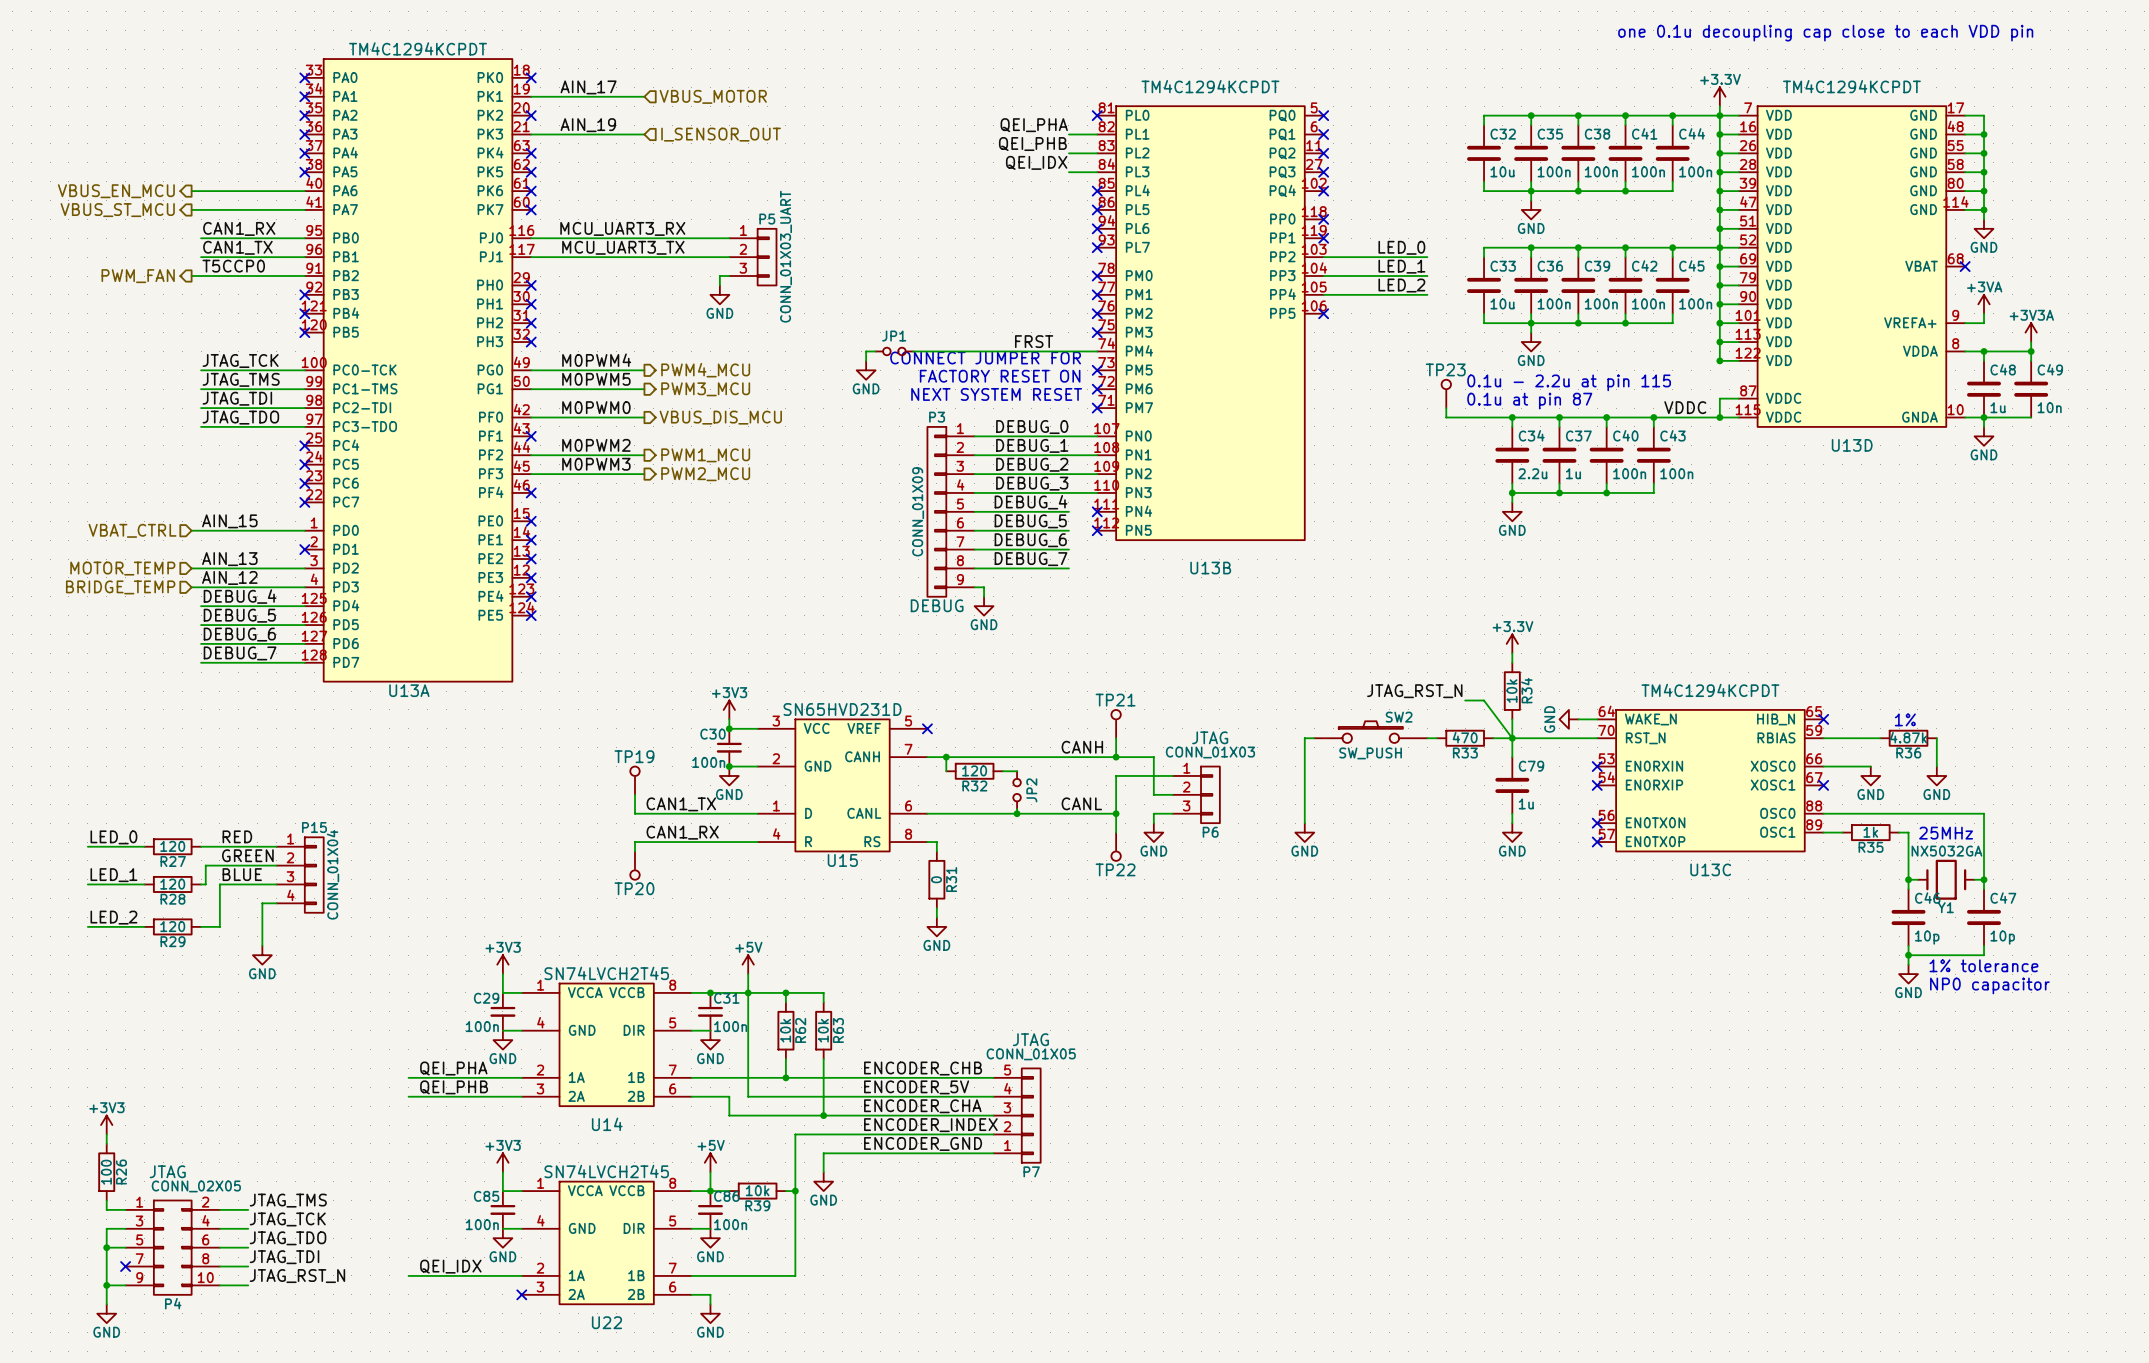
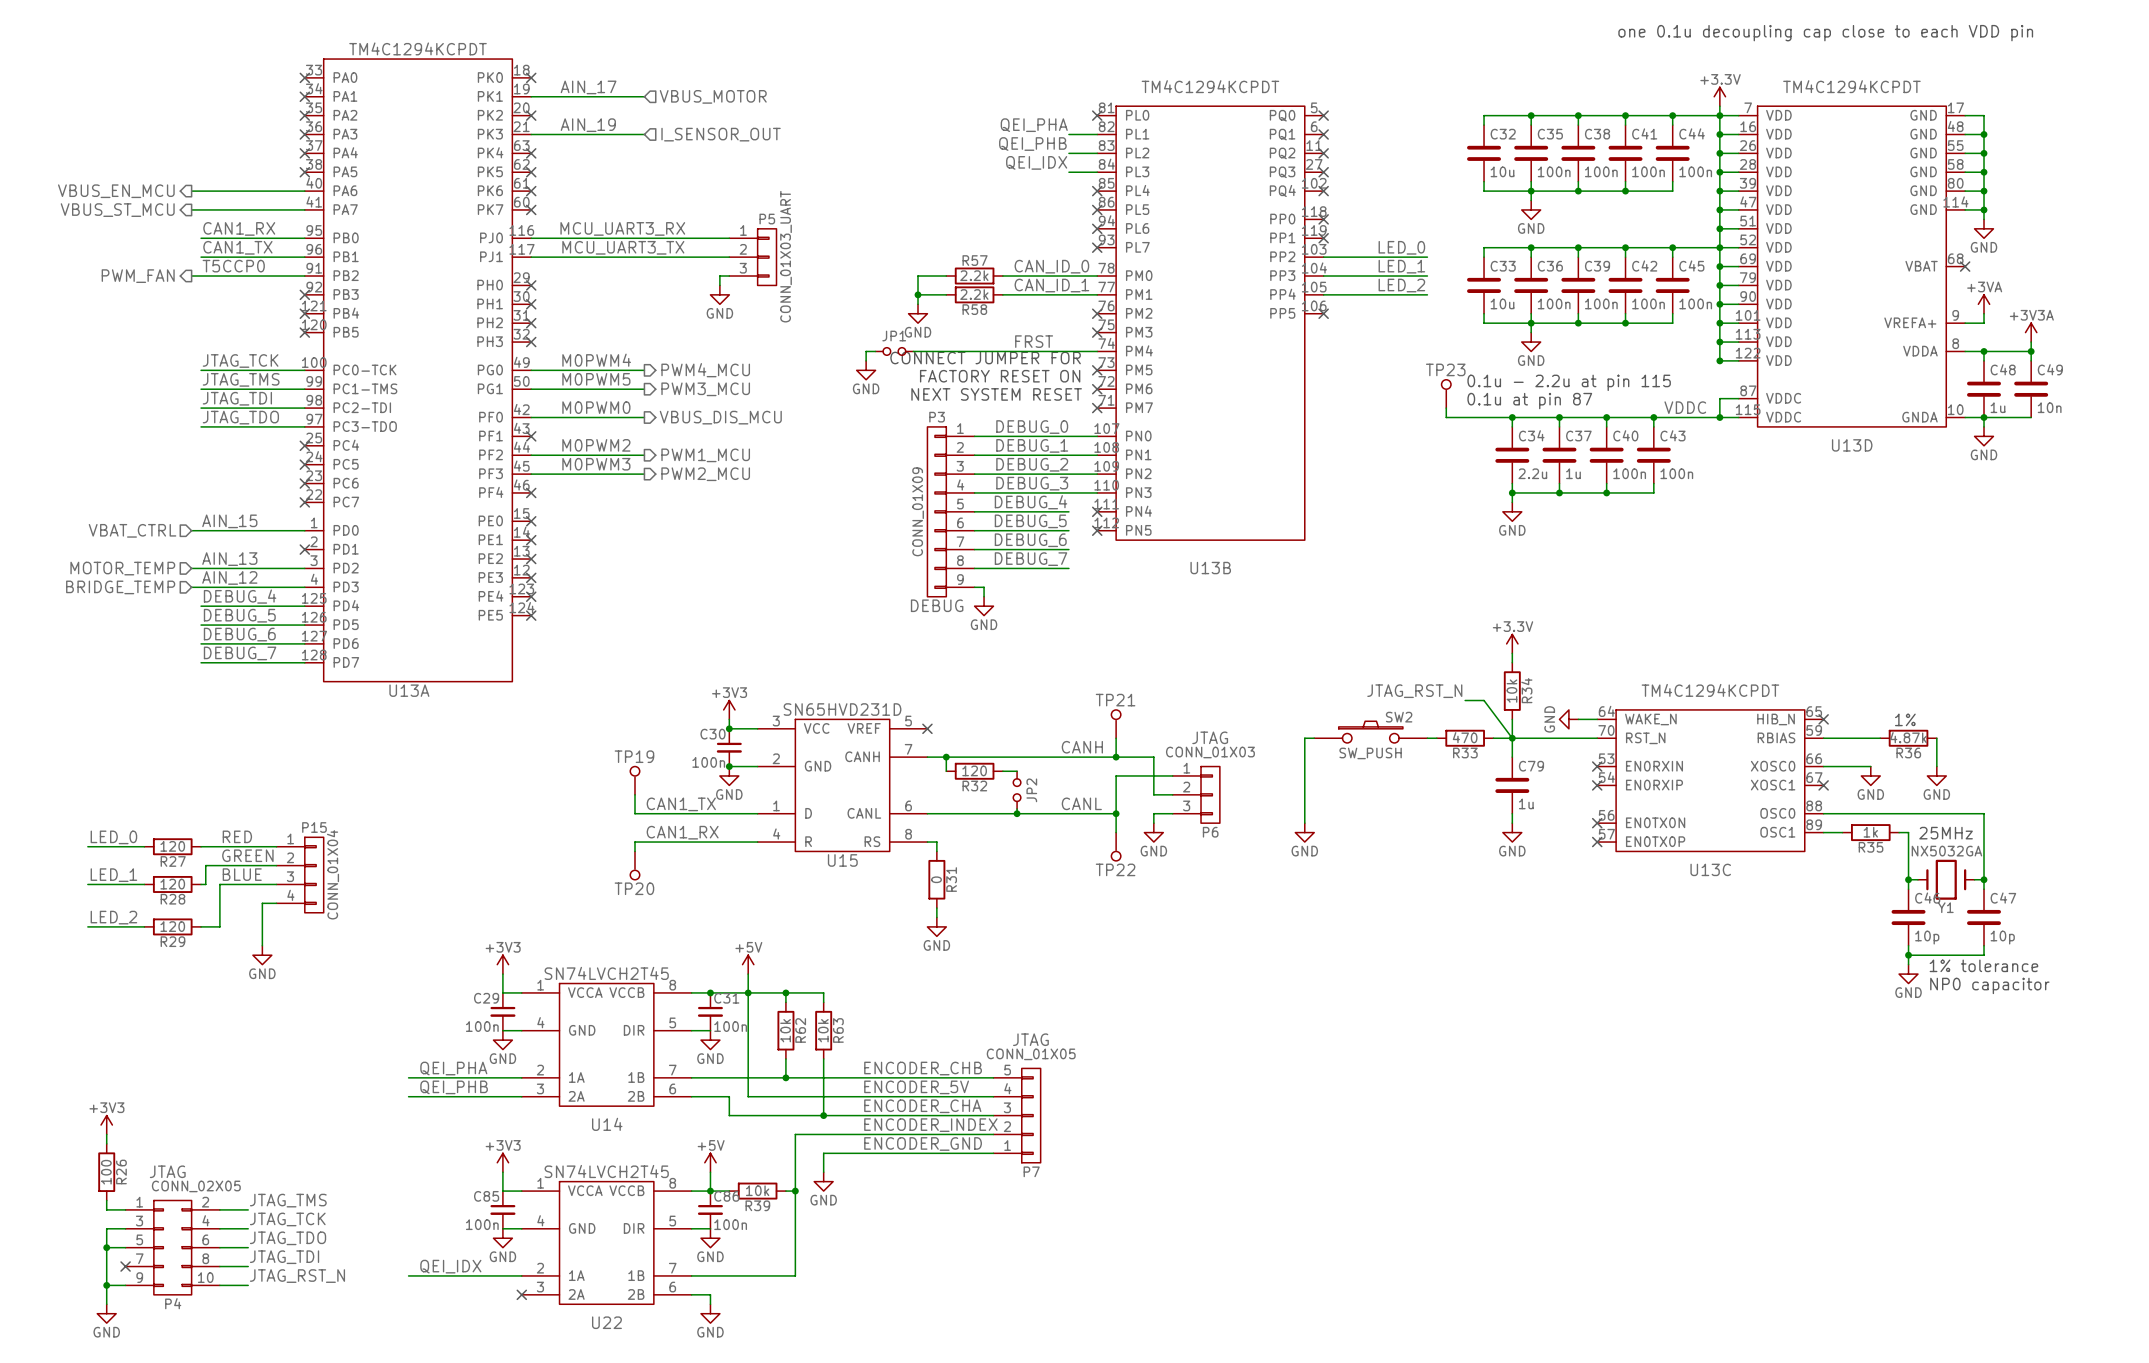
label: none -> CAN_ID_0 (1051, 266)
wire: none -> (946, 276) (918, 276) (918, 304)
R57: none -> 2.2k (974, 276)
wire: none -> (1002, 276) (1097, 276)
no-connect mark: (1097, 276) -> none
label: none -> CAN_ID_1 (1051, 285)
wire: none -> (918, 294) (946, 294)
junction: none -> (918, 294)
R58: none -> 2.2k (974, 294)
wire: none -> (1002, 294) (1097, 294)
no-connect mark: (1097, 294) -> none
power symbol: none -> GND (918, 313)

